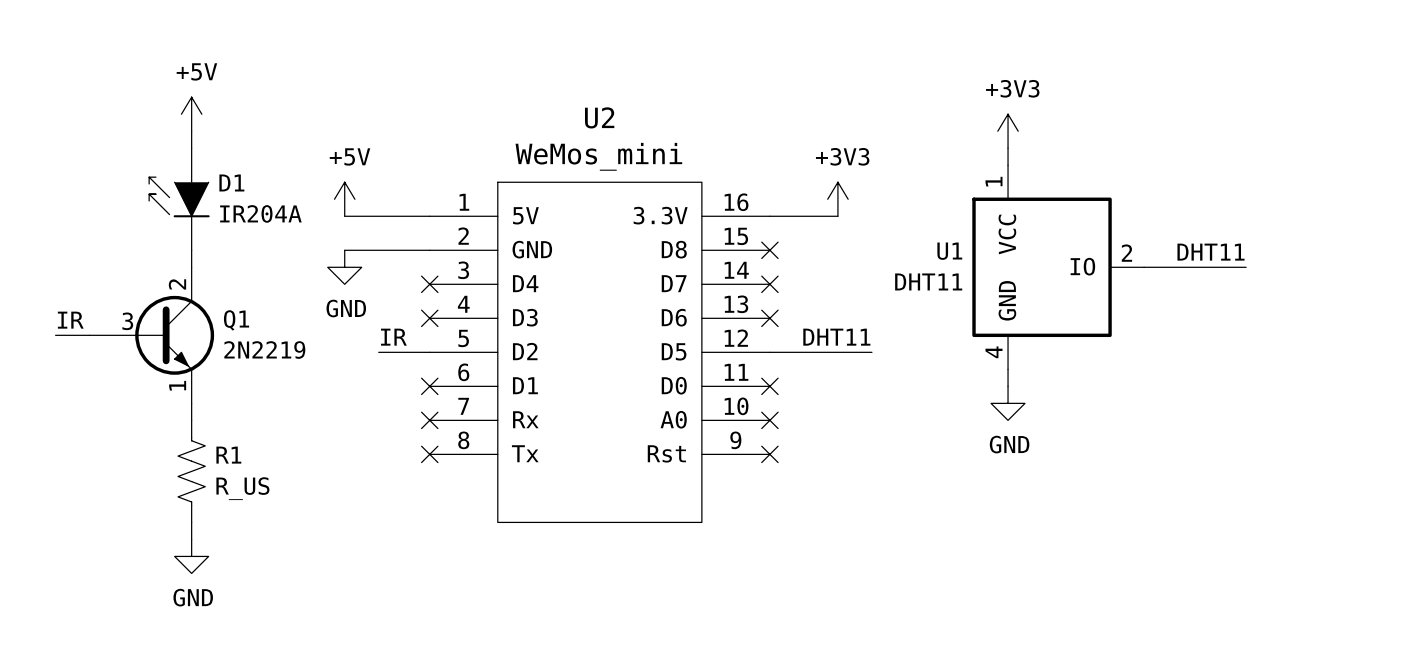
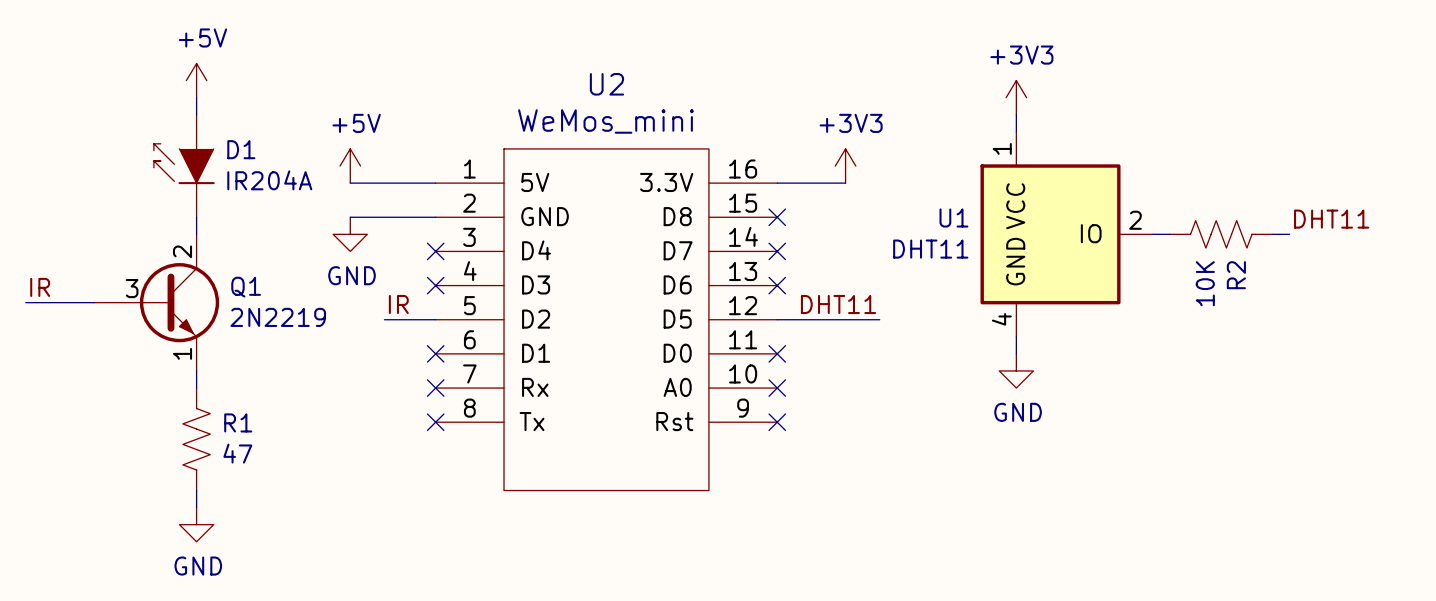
label position: DHT11 (1211, 252) -> DHT11 (1331, 219)
wire: (1161, 267) (1246, 267) -> none
R2: none -> 10K (1221, 234)
wire: none -> (1272, 234) (1289, 234)
label position: IR (70, 320) -> IR (40, 287)
wire: none -> (25, 302) (59, 302)
R1 value: R_US (242, 488) -> 47 (237, 453)

